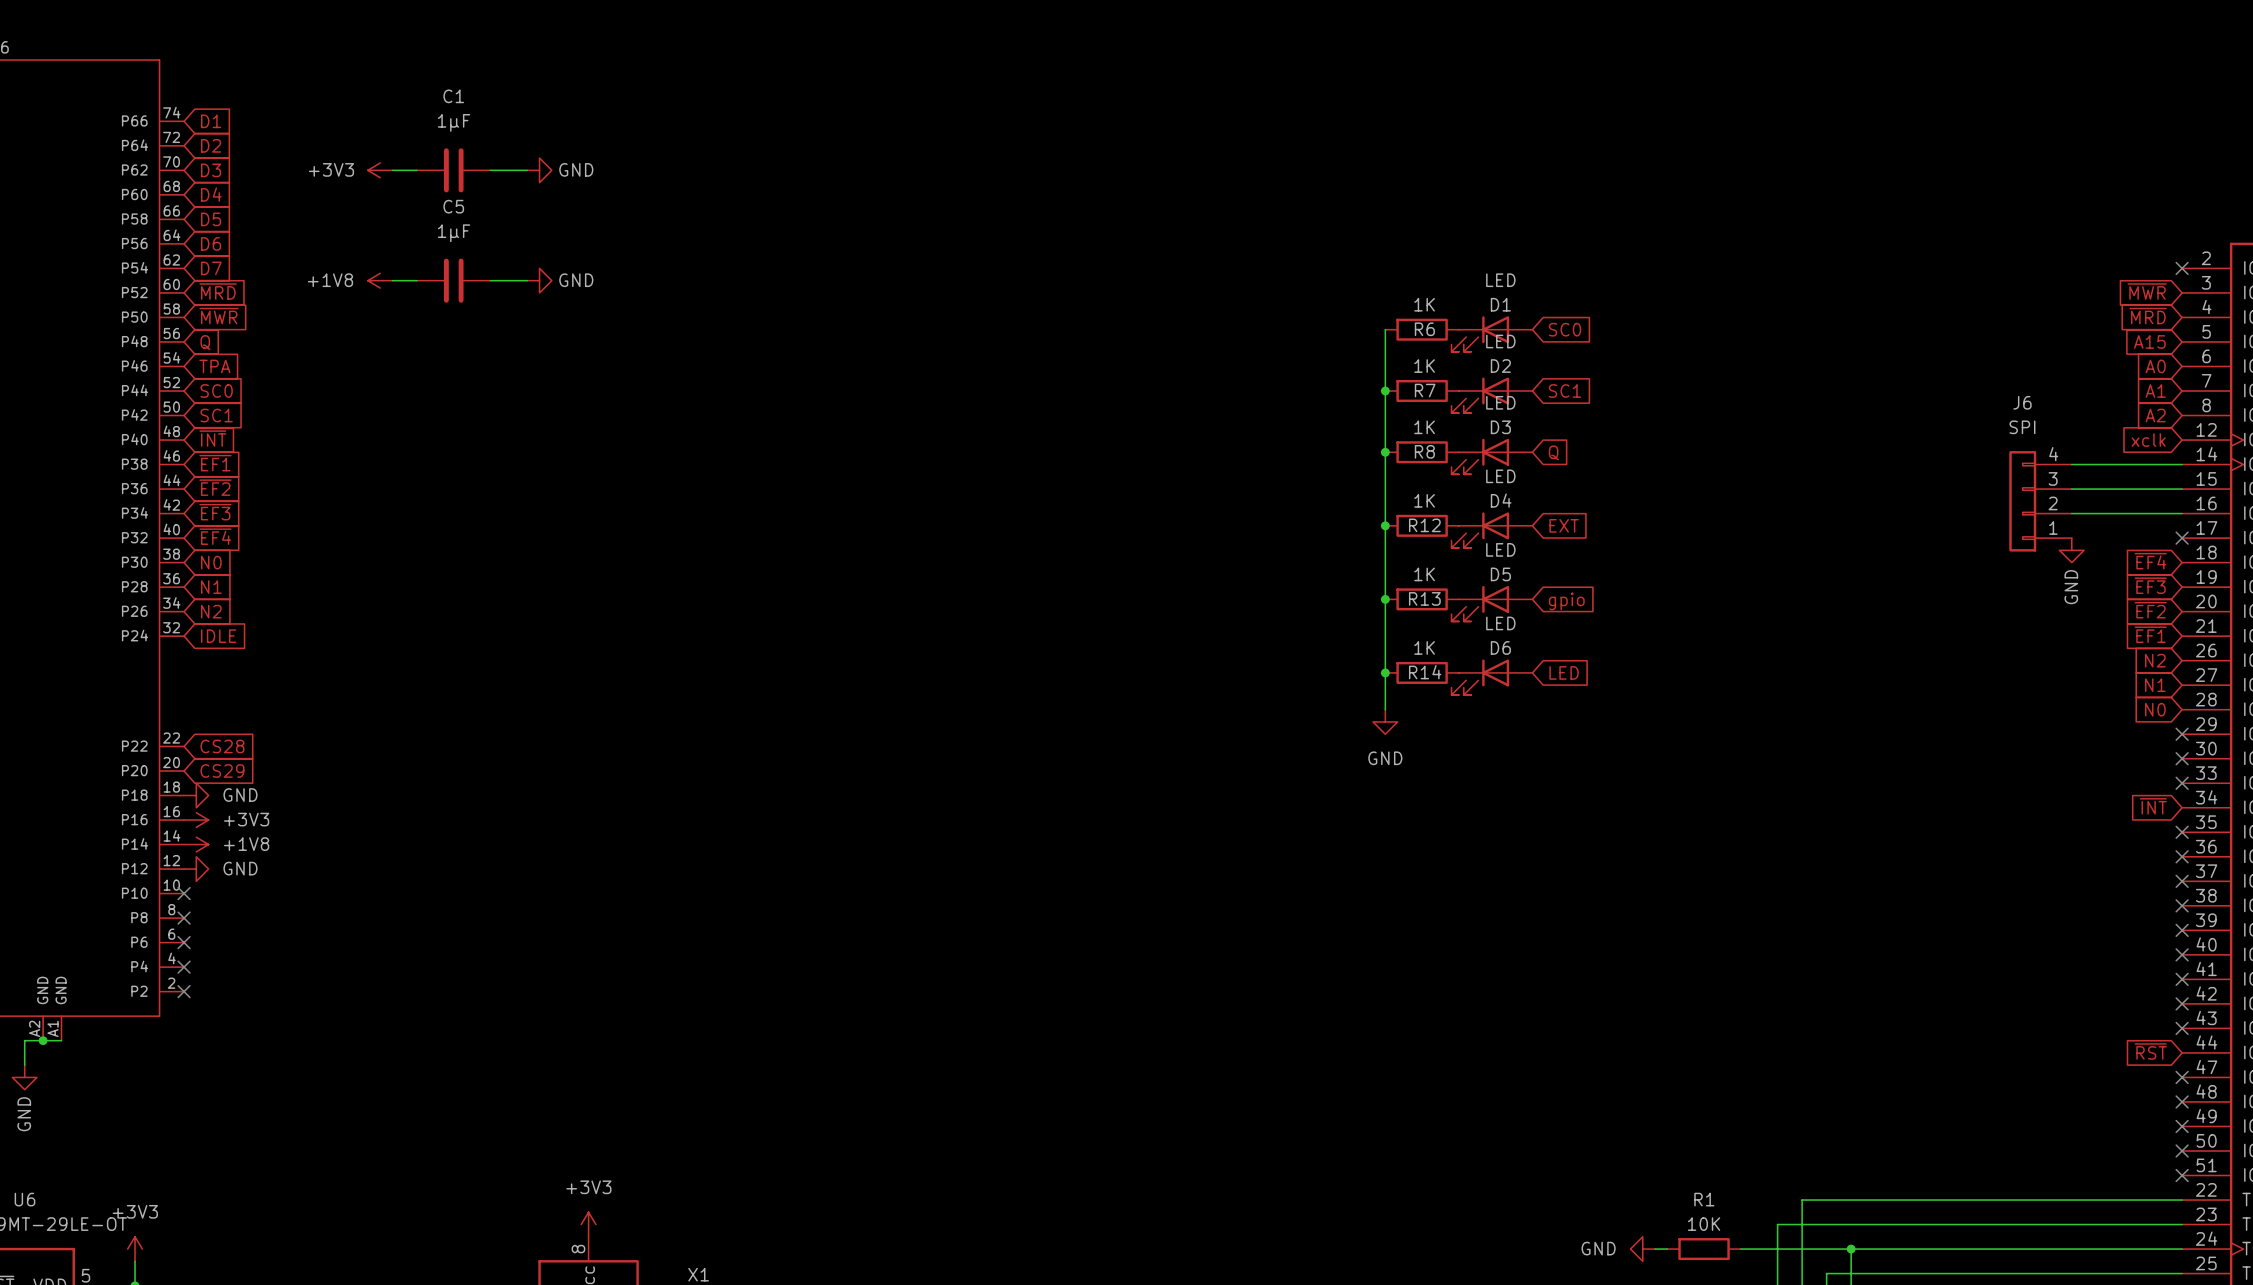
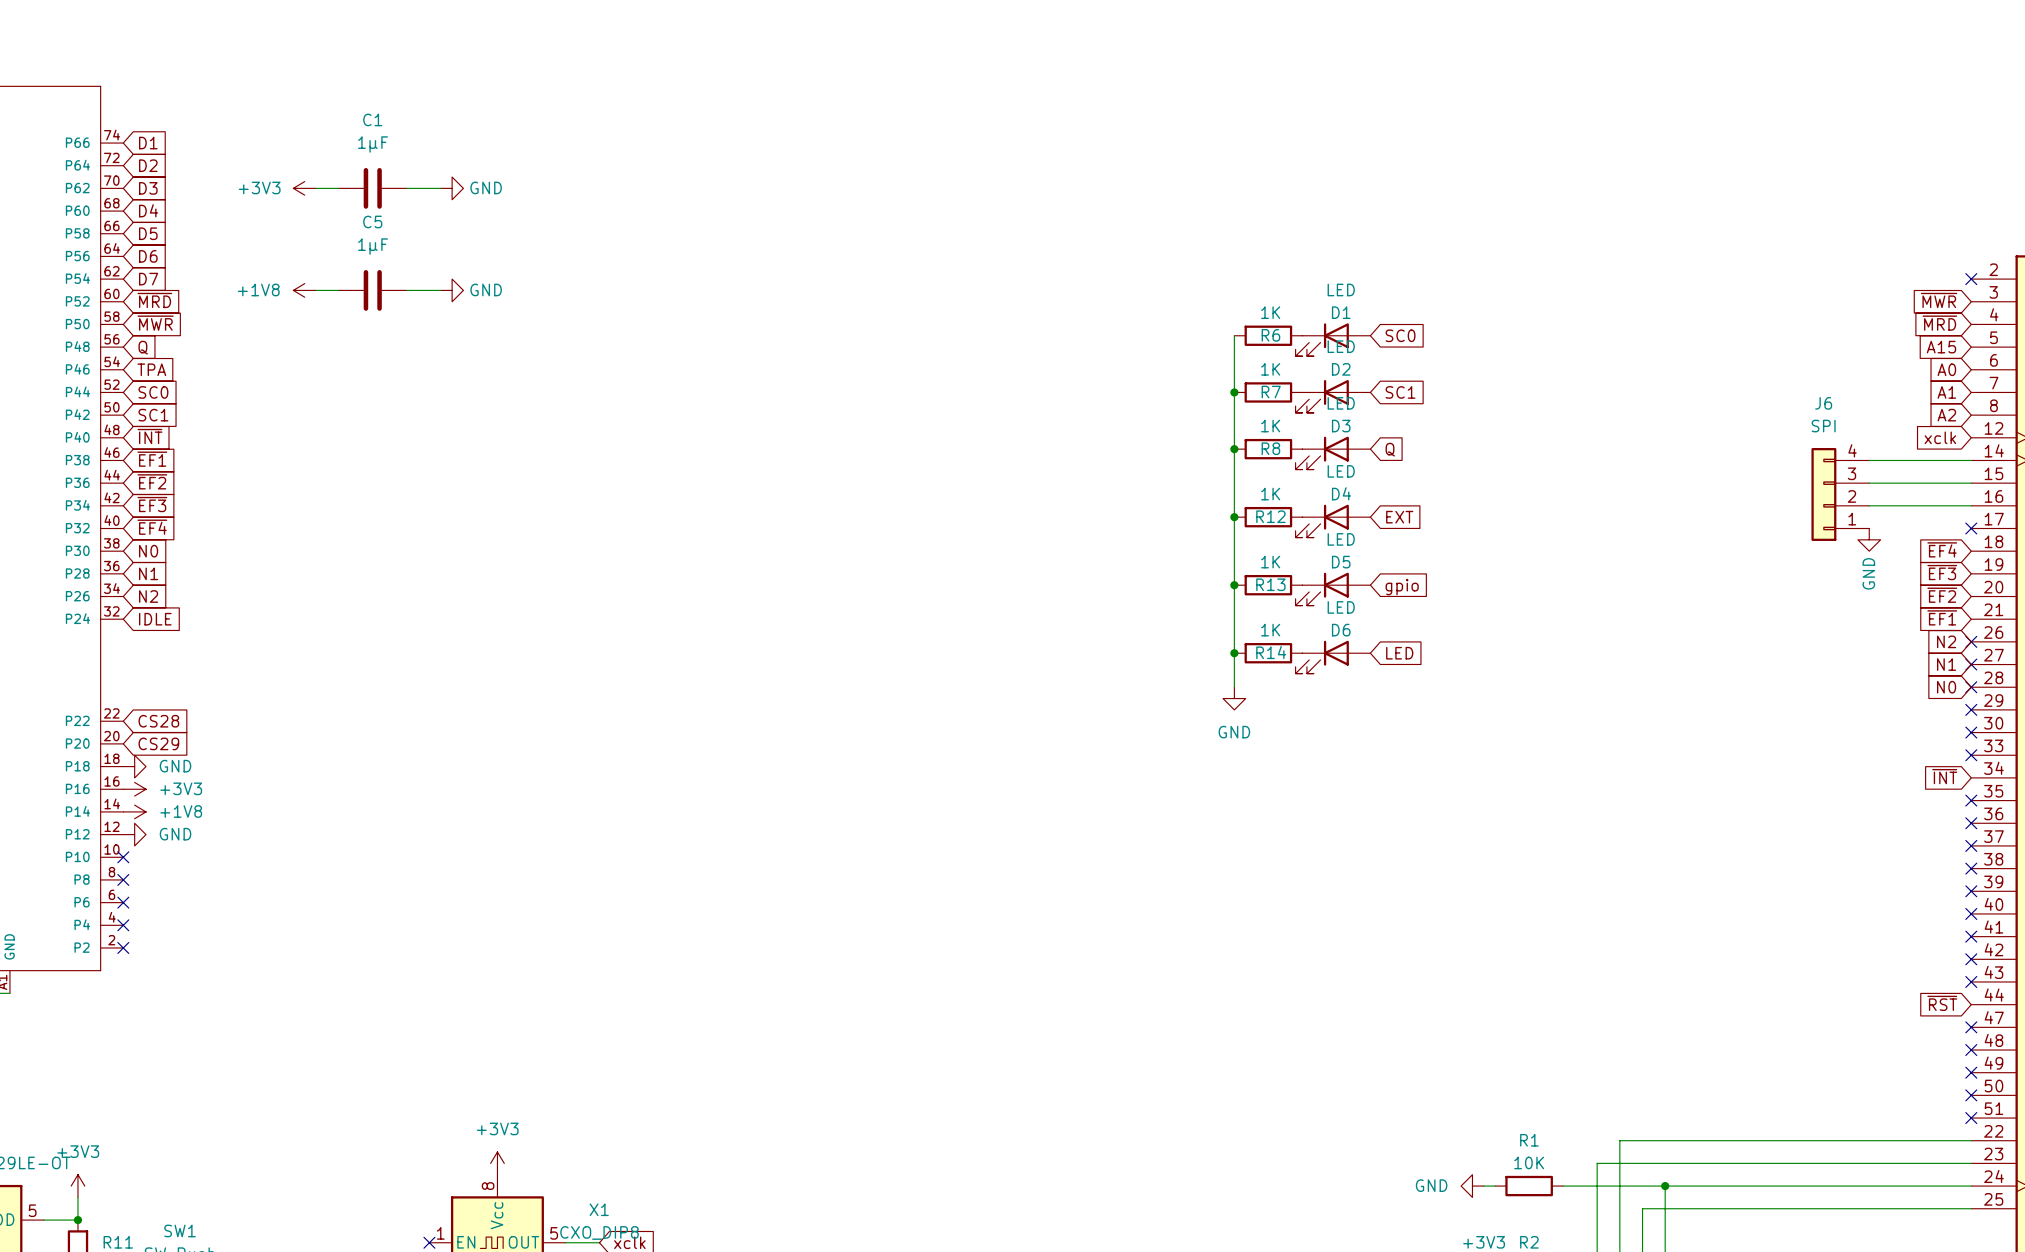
no-connect mark: none -> (1971, 641)
no-connect mark: none -> (1971, 664)
no-connect mark: none -> (1971, 687)

